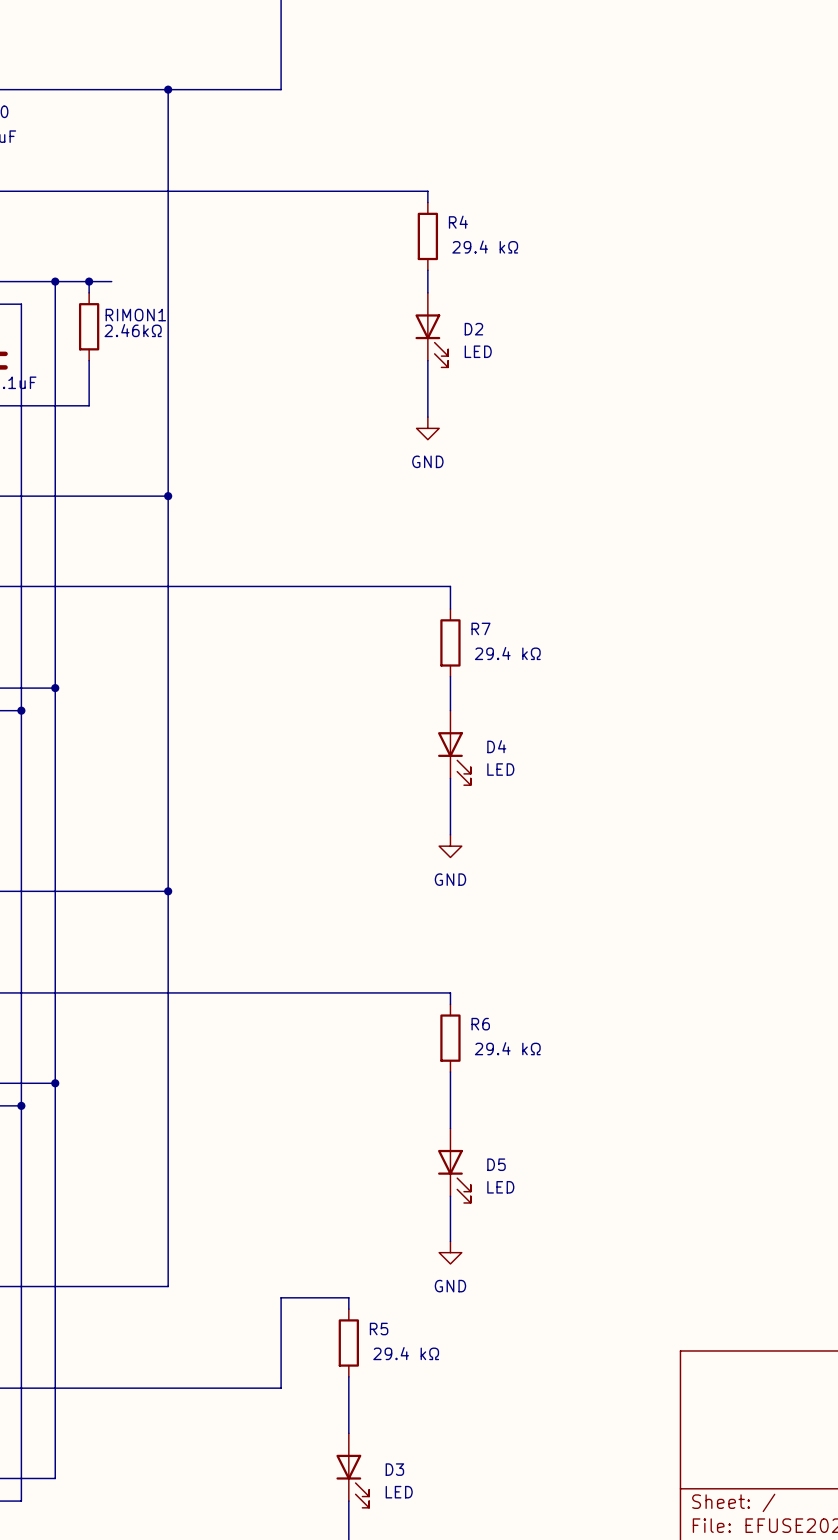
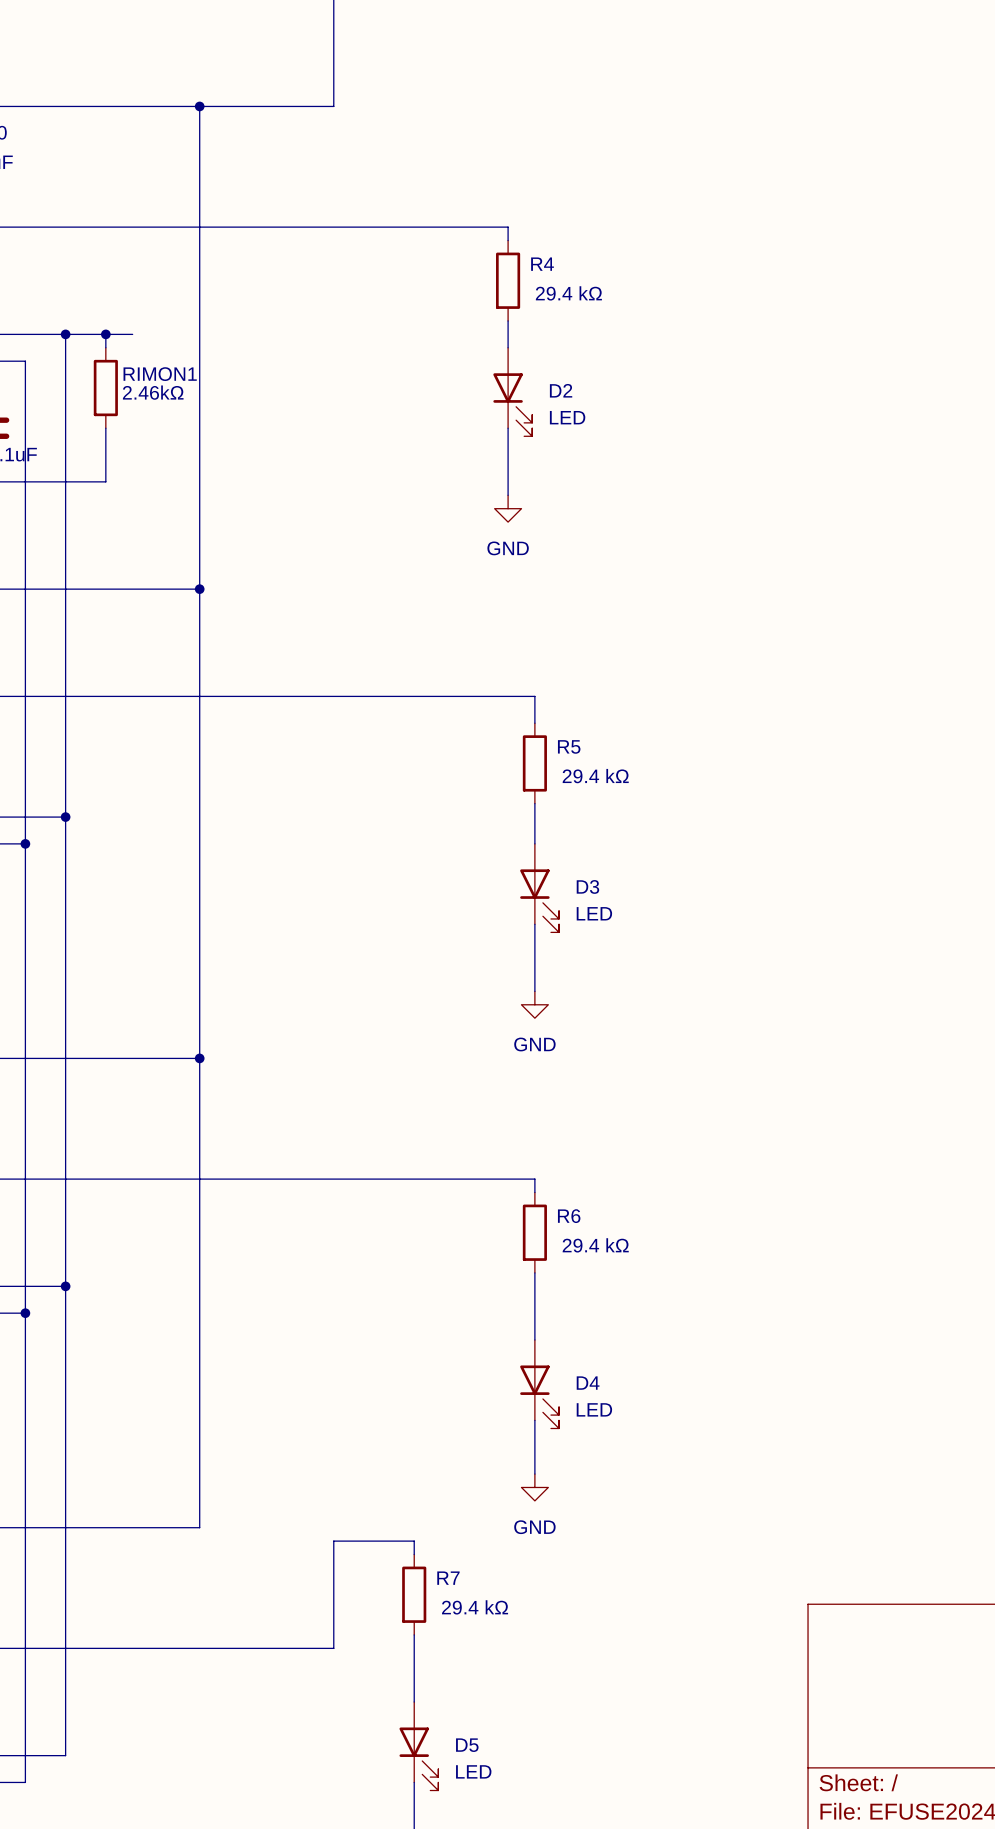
R7 name: R7 (480, 628) -> R5 (569, 746)
D4 name: D4 (496, 746) -> D3 (587, 886)
D5 name: D5 (496, 1164) -> D4 (588, 1383)
R5 name: R5 (379, 1329) -> R7 (448, 1578)
D3 name: D3 (394, 1469) -> D5 (467, 1745)

